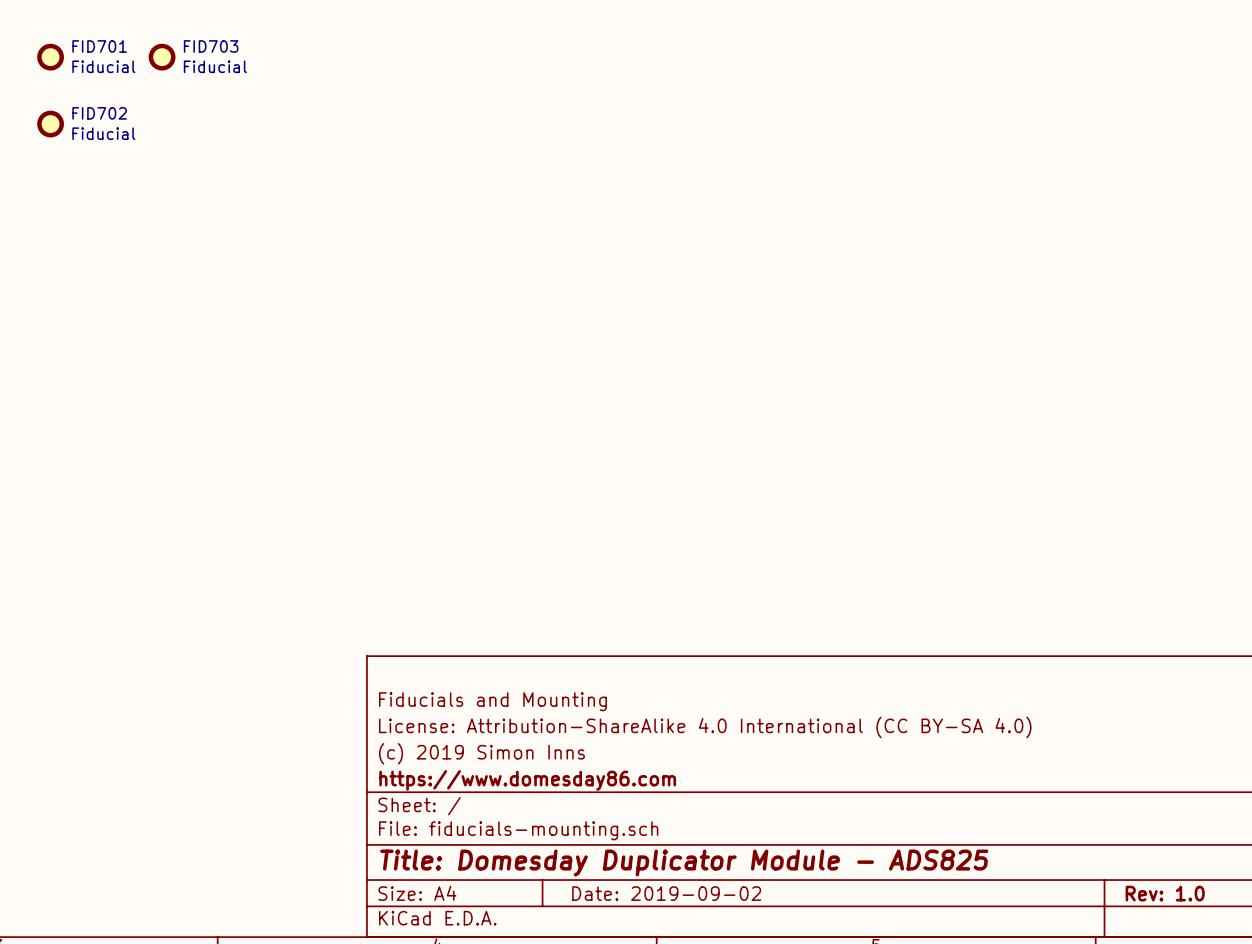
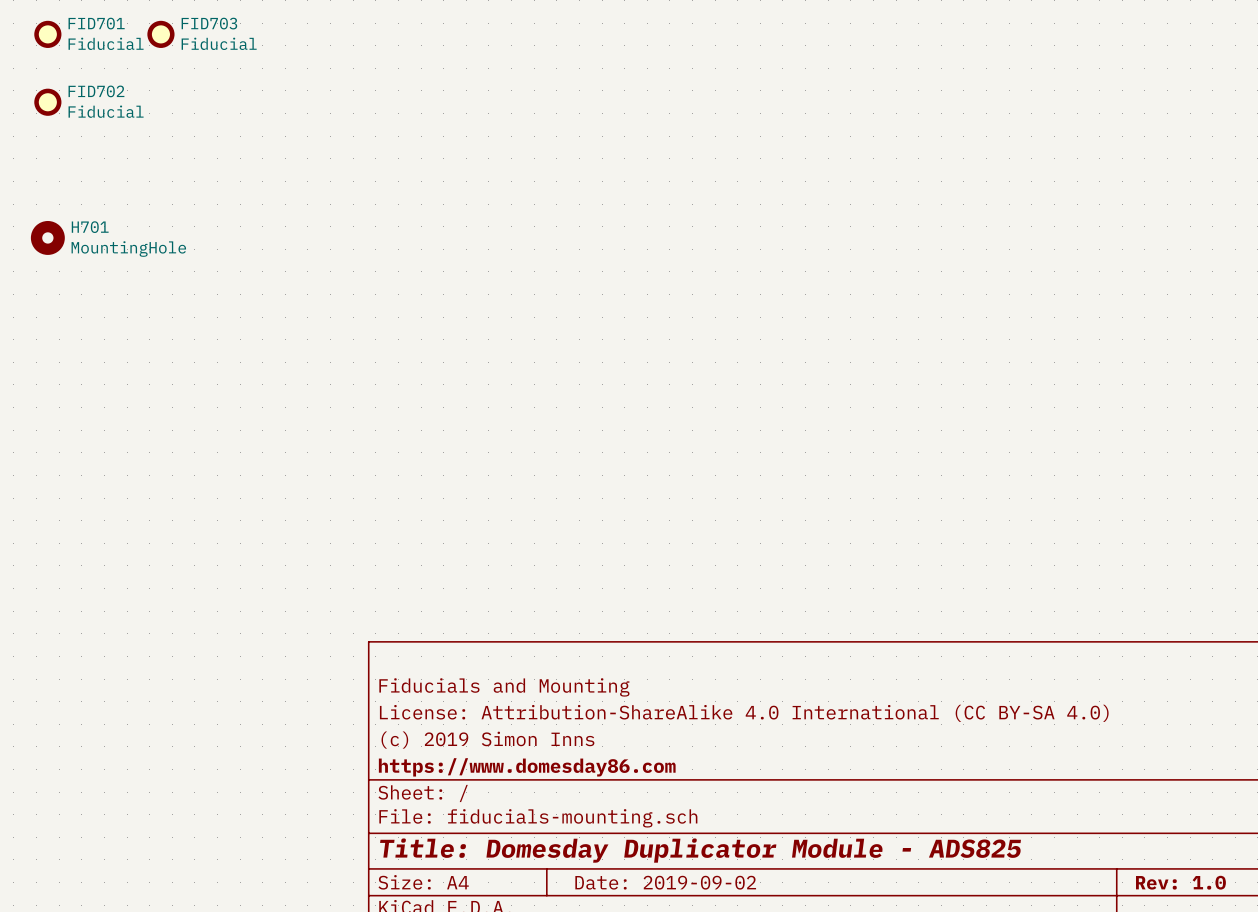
H701: none -> MountingHole (47, 237)

